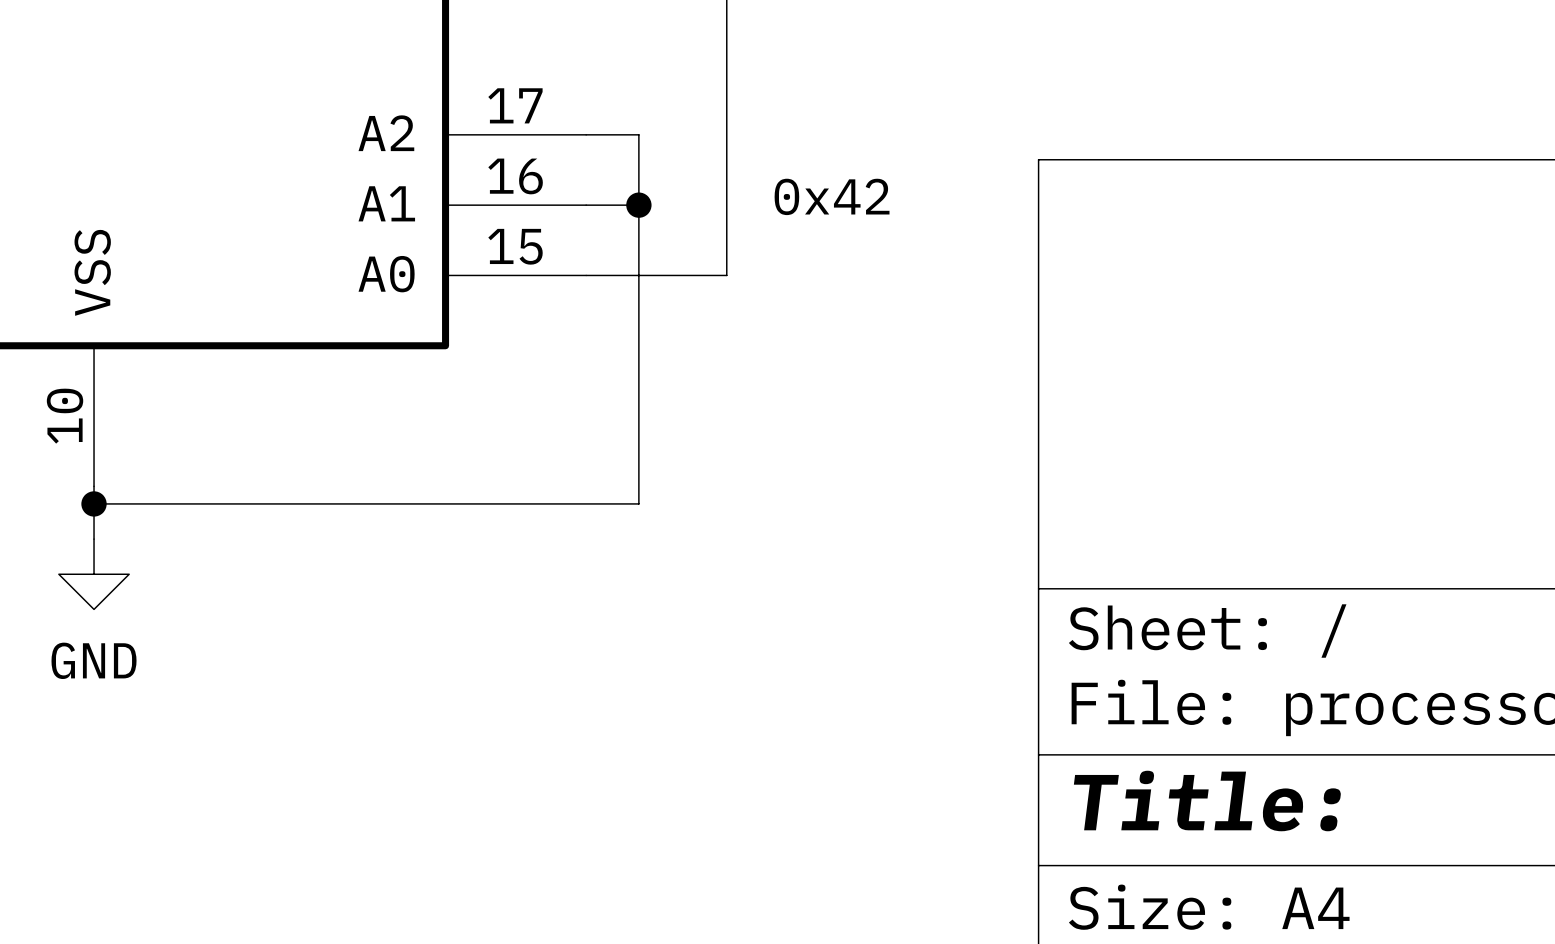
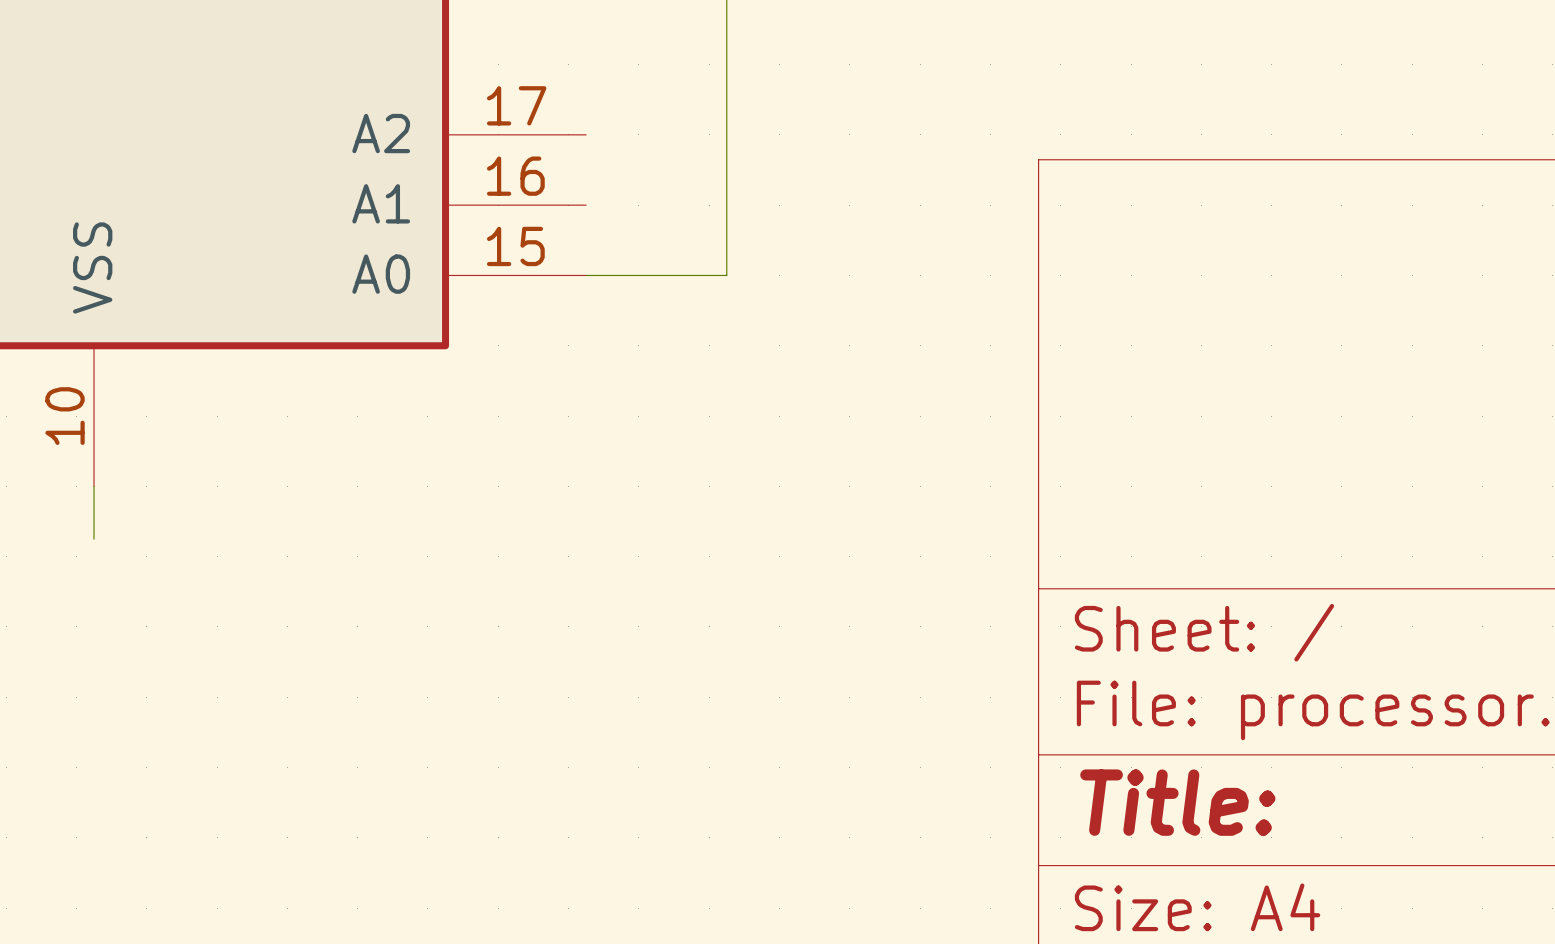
wire: (586, 134) (638, 134) (638, 503) (94, 503) -> none
text: 0x42 (832, 196) -> none
wire: (586, 205) (638, 205) -> none
junction: (638, 205) -> none
junction: (94, 503) -> none
power symbol: GND (94, 574) -> none

